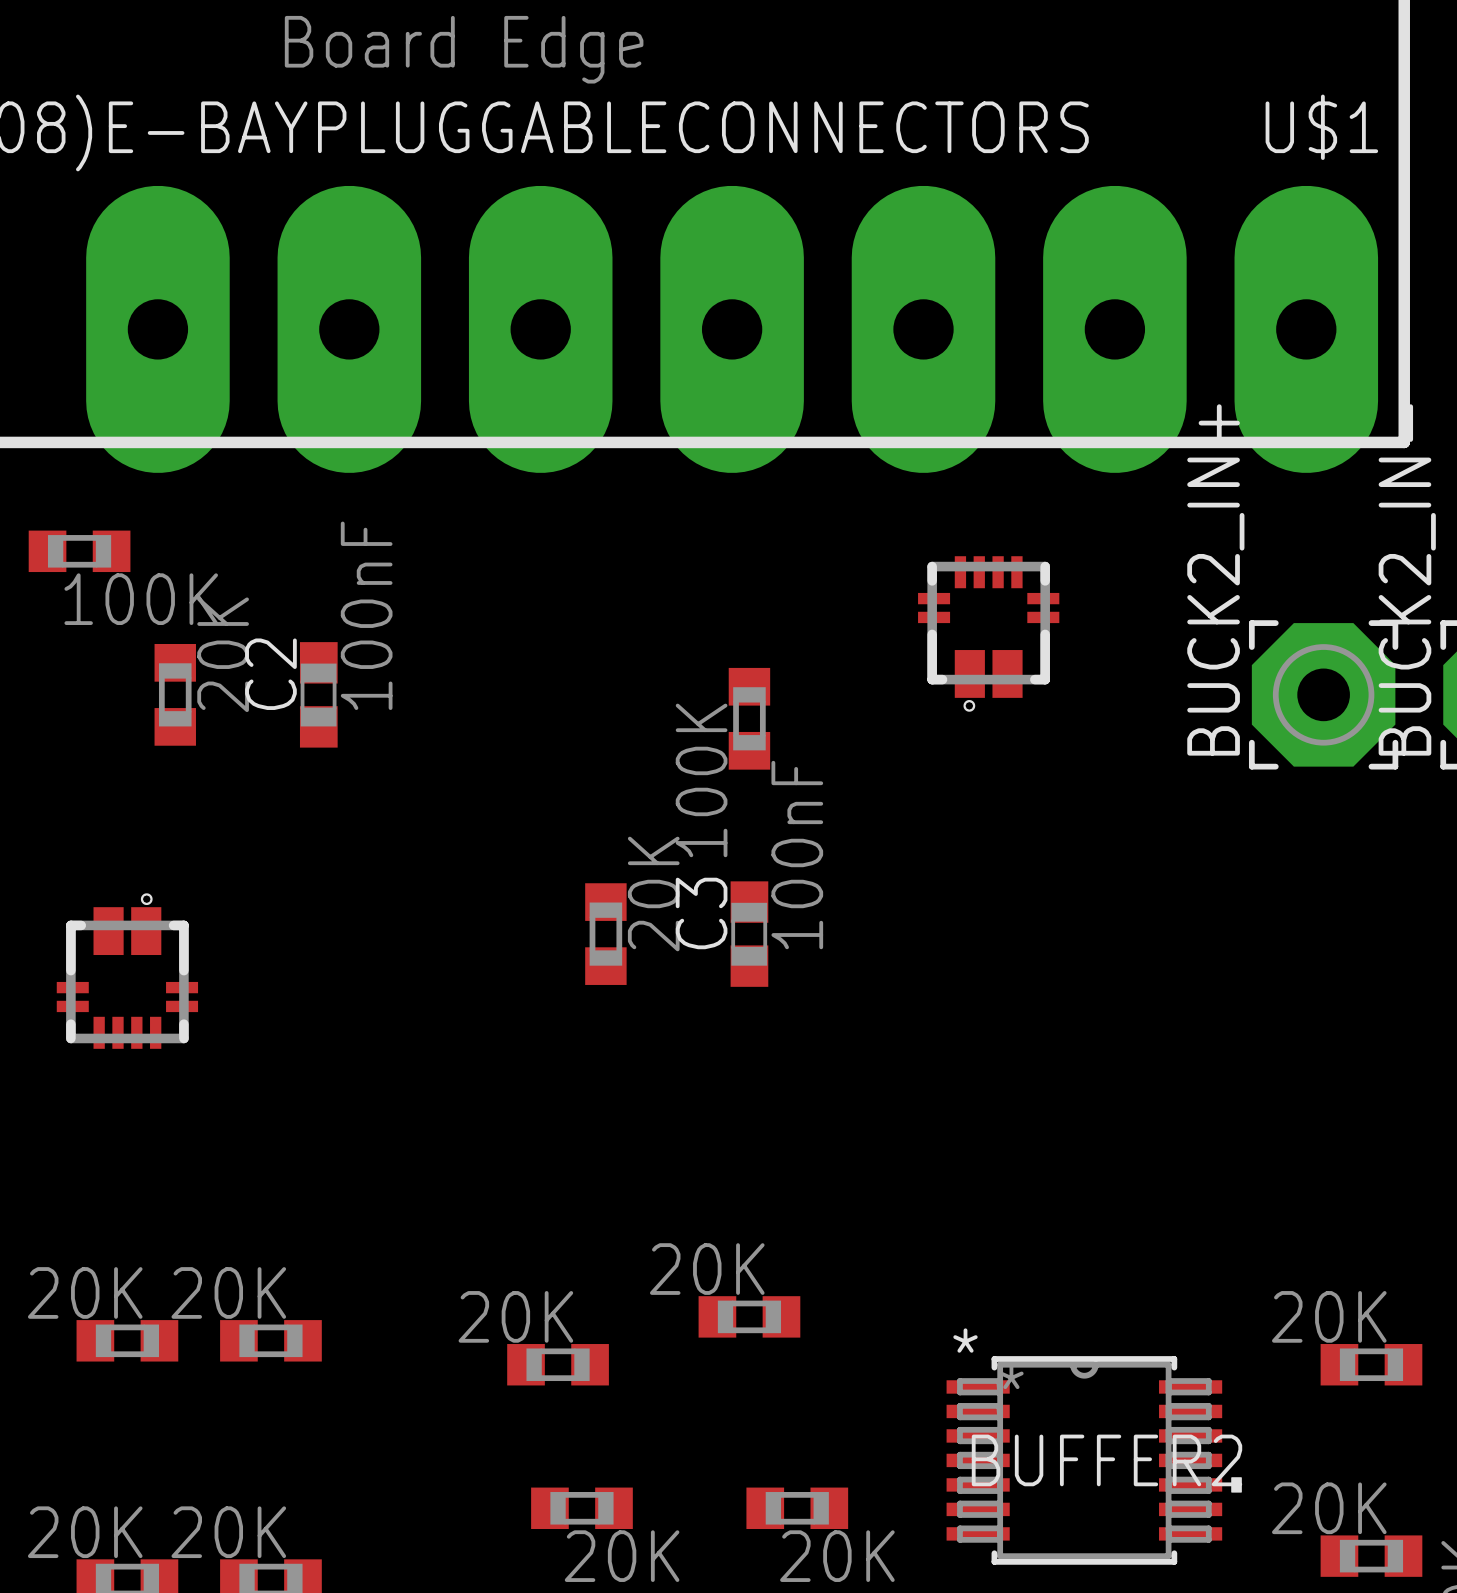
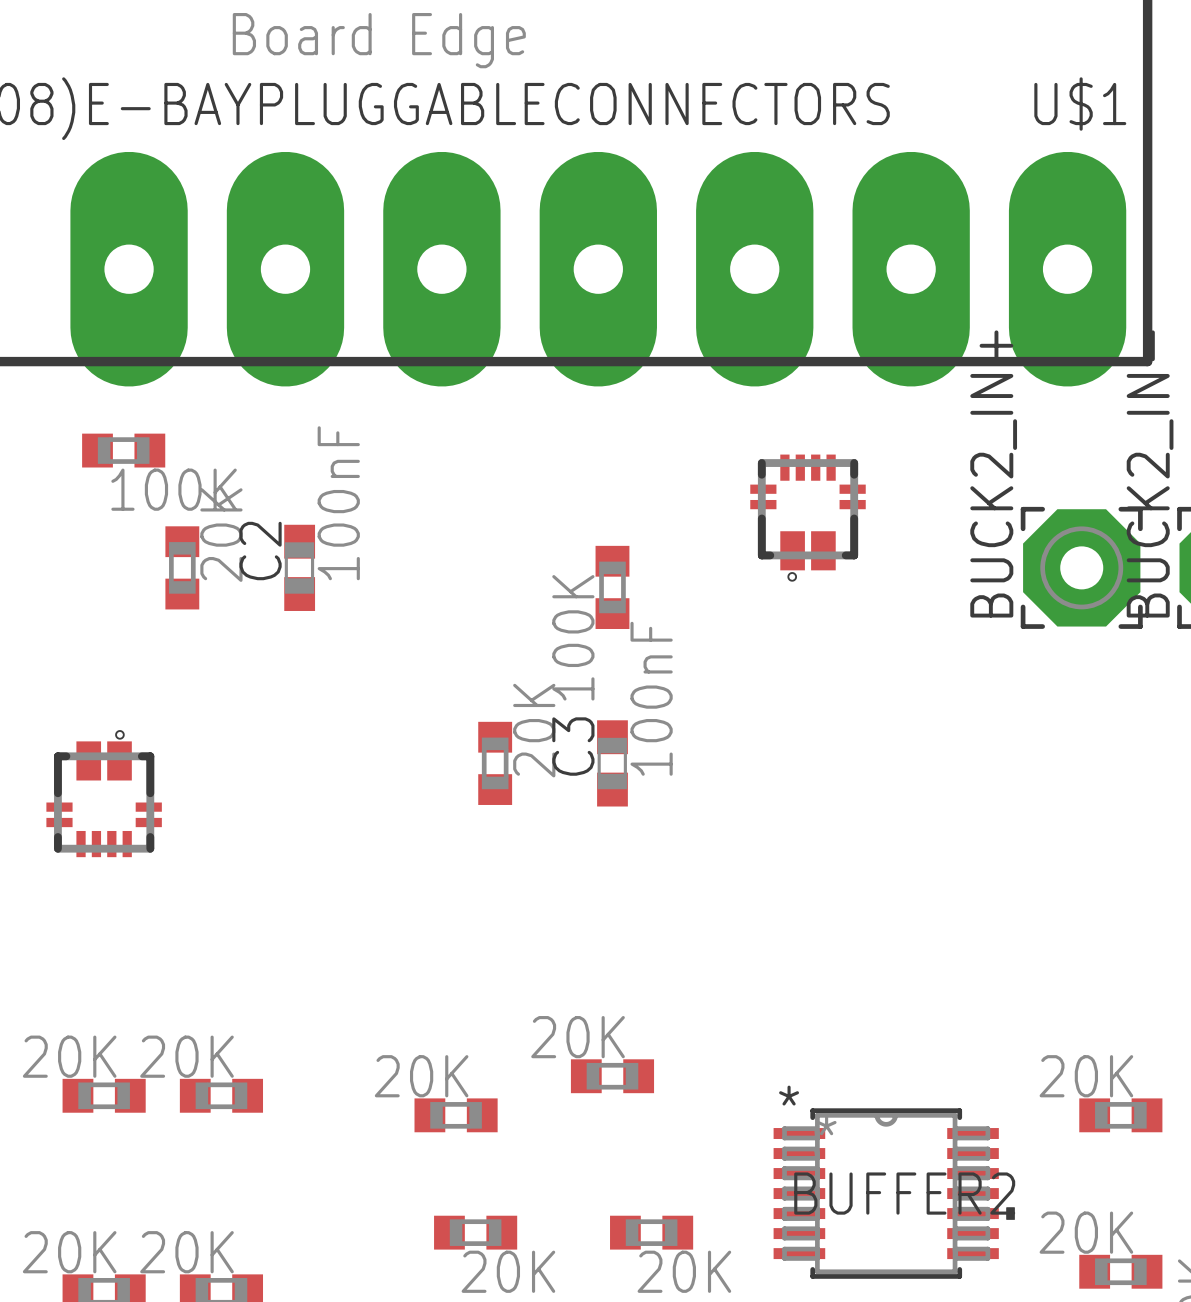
part position: (79, 551) -> (123, 450)
part position: (175, 694) -> (182, 567)
C2 position: (318, 694) -> (299, 567)

